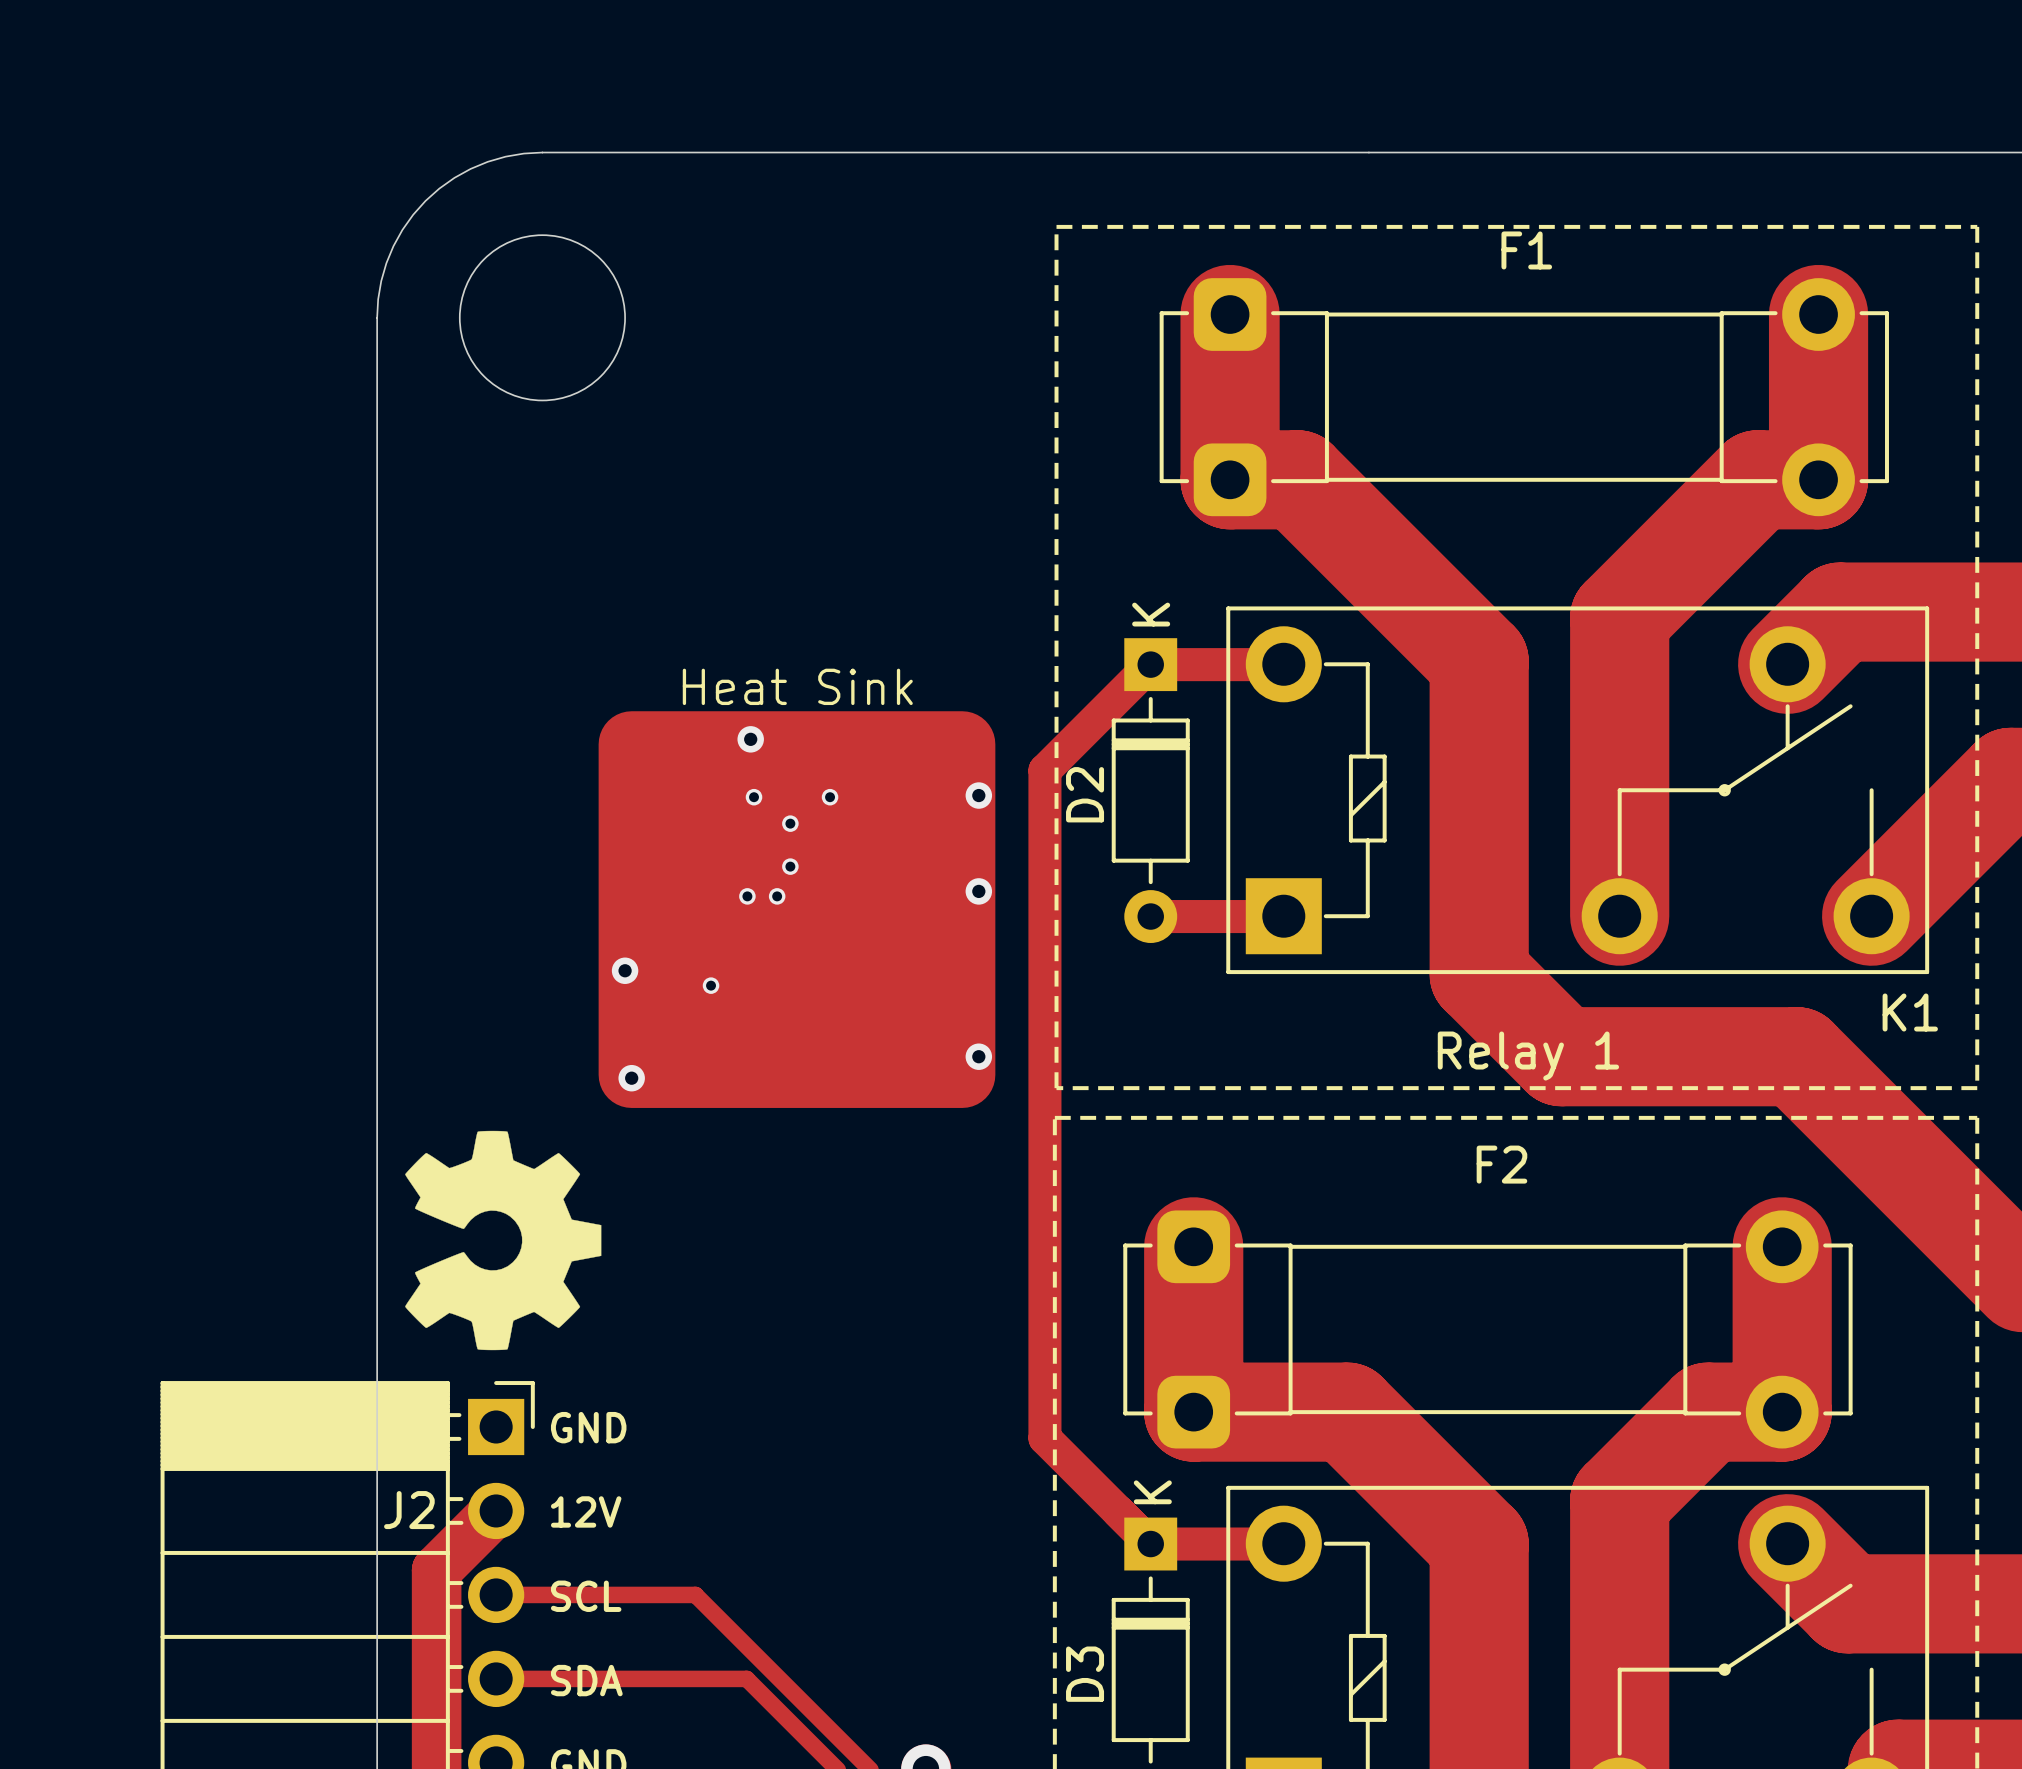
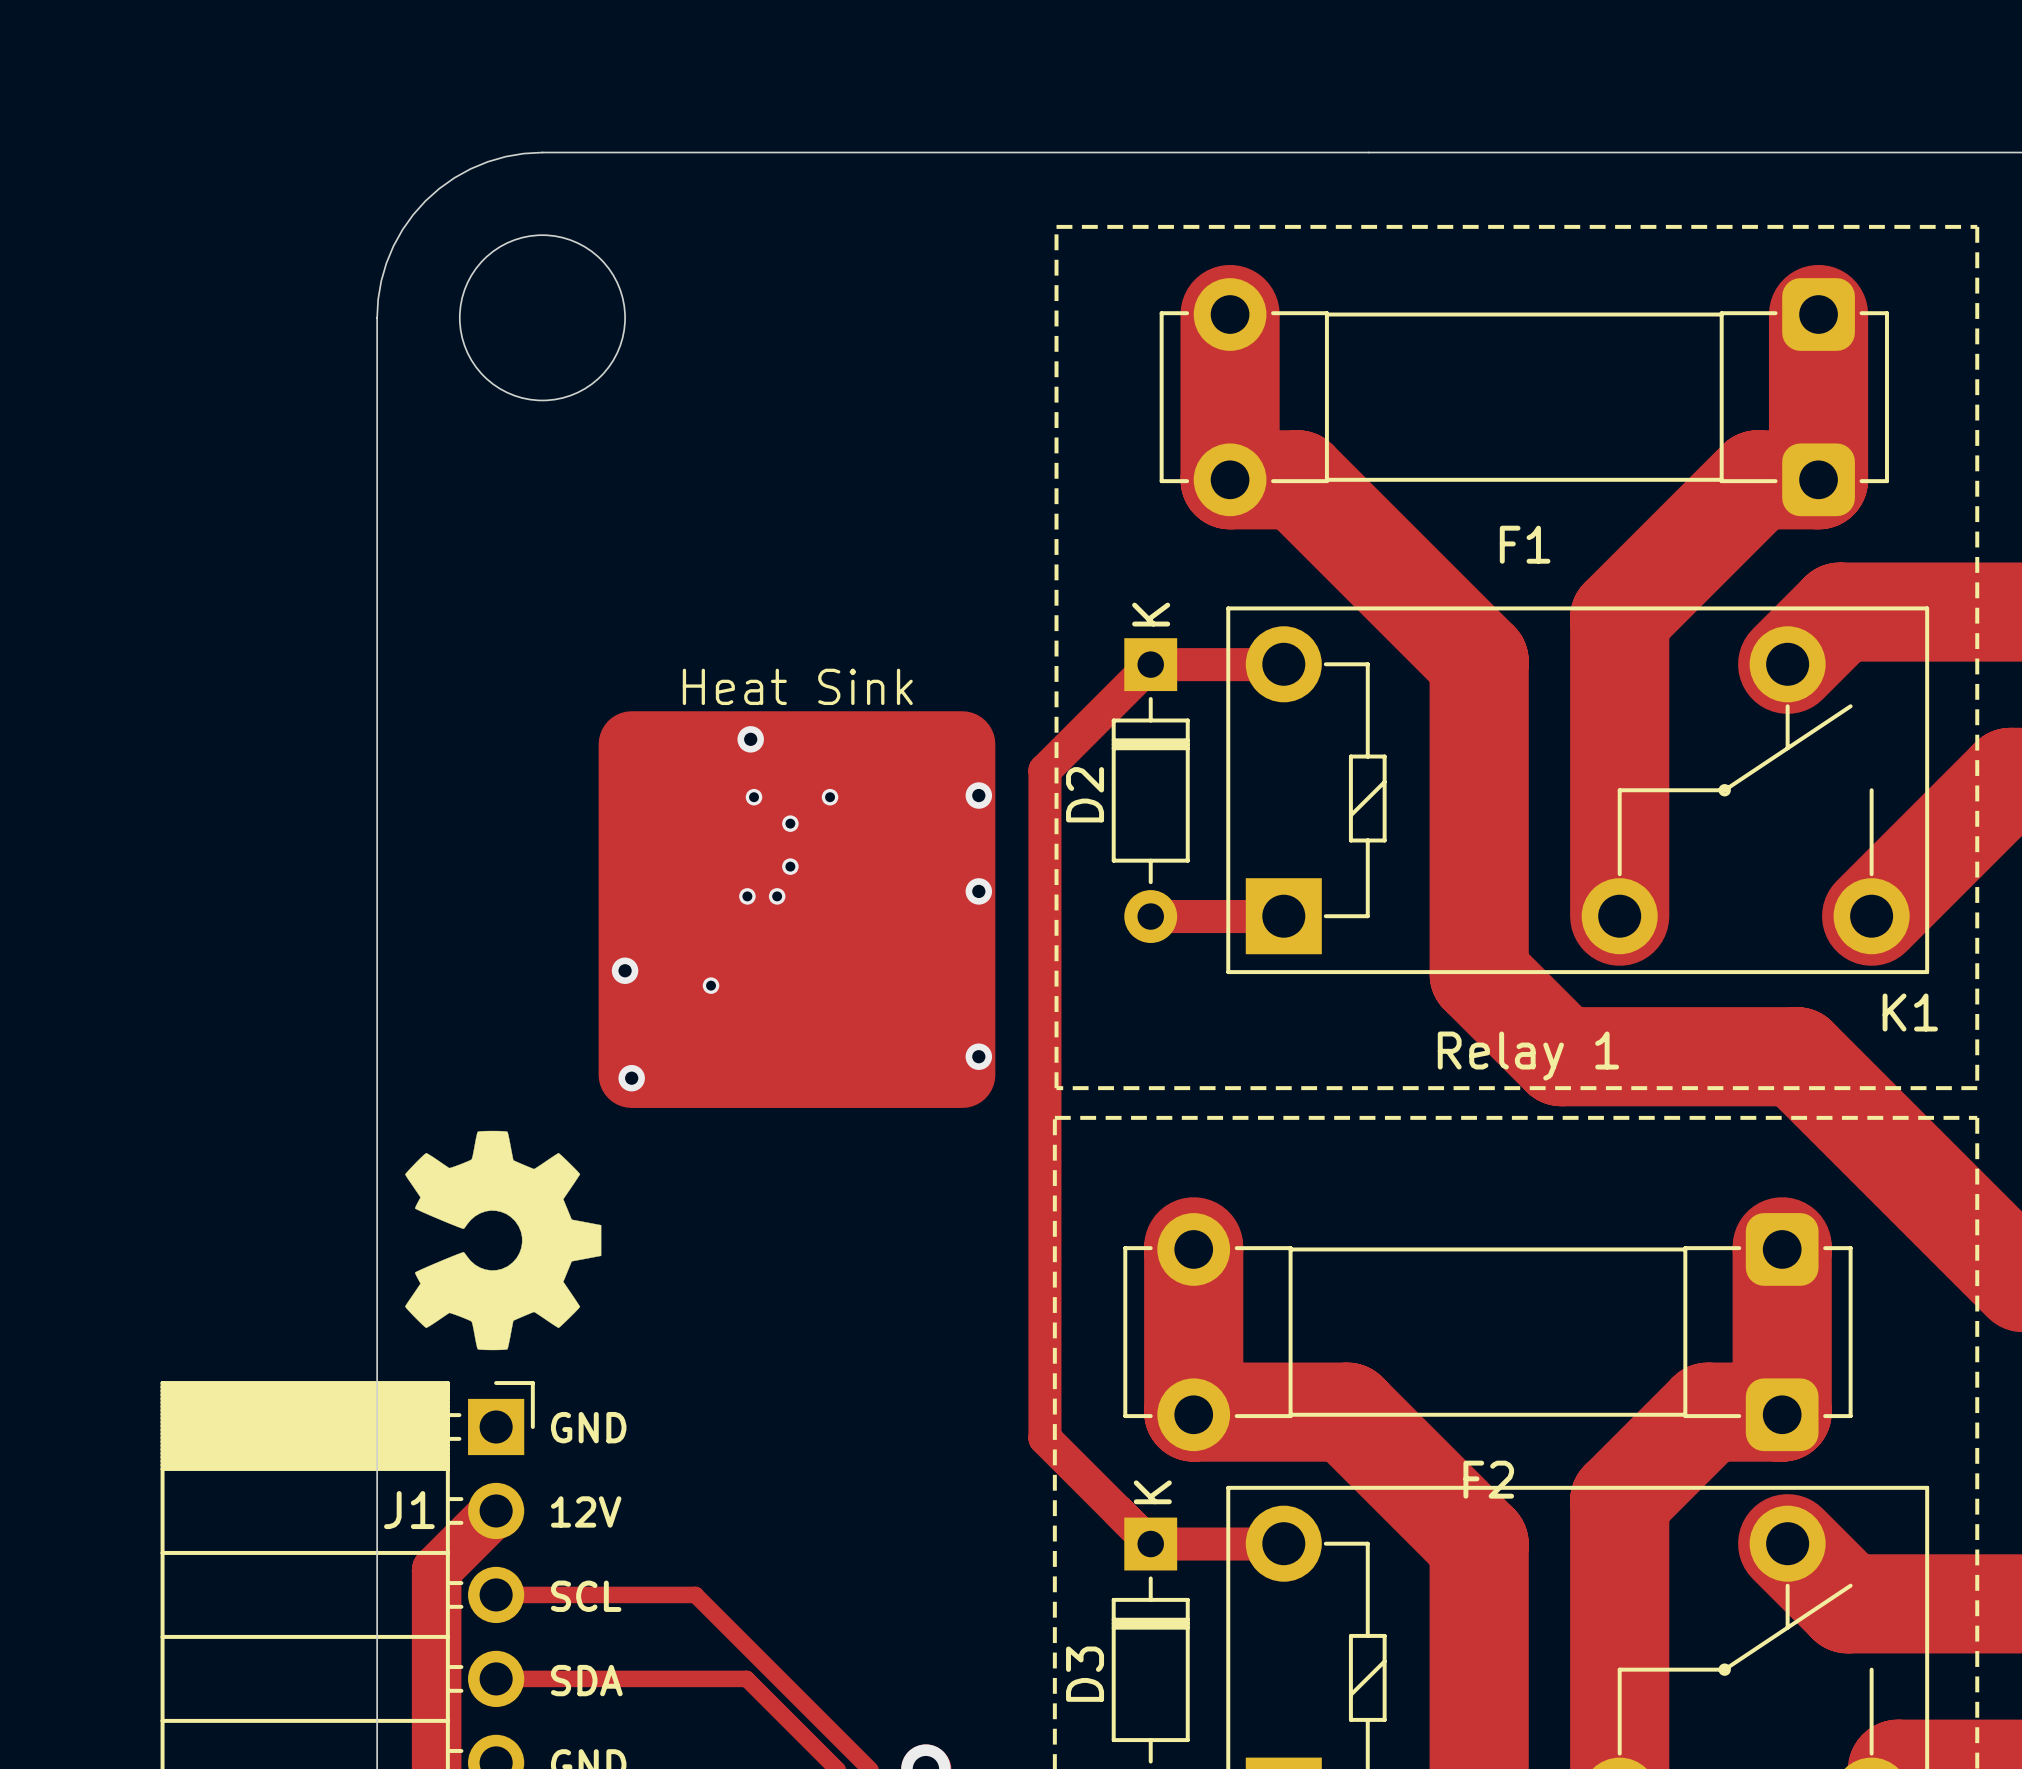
F1 rotation: 0° (1524, 397) -> 180° (1524, 397)
F2 rotation: 0° (1487, 1329) -> 180° (1487, 1332)
J2 name: J2 (409, 1510) -> J1 (409, 1510)

